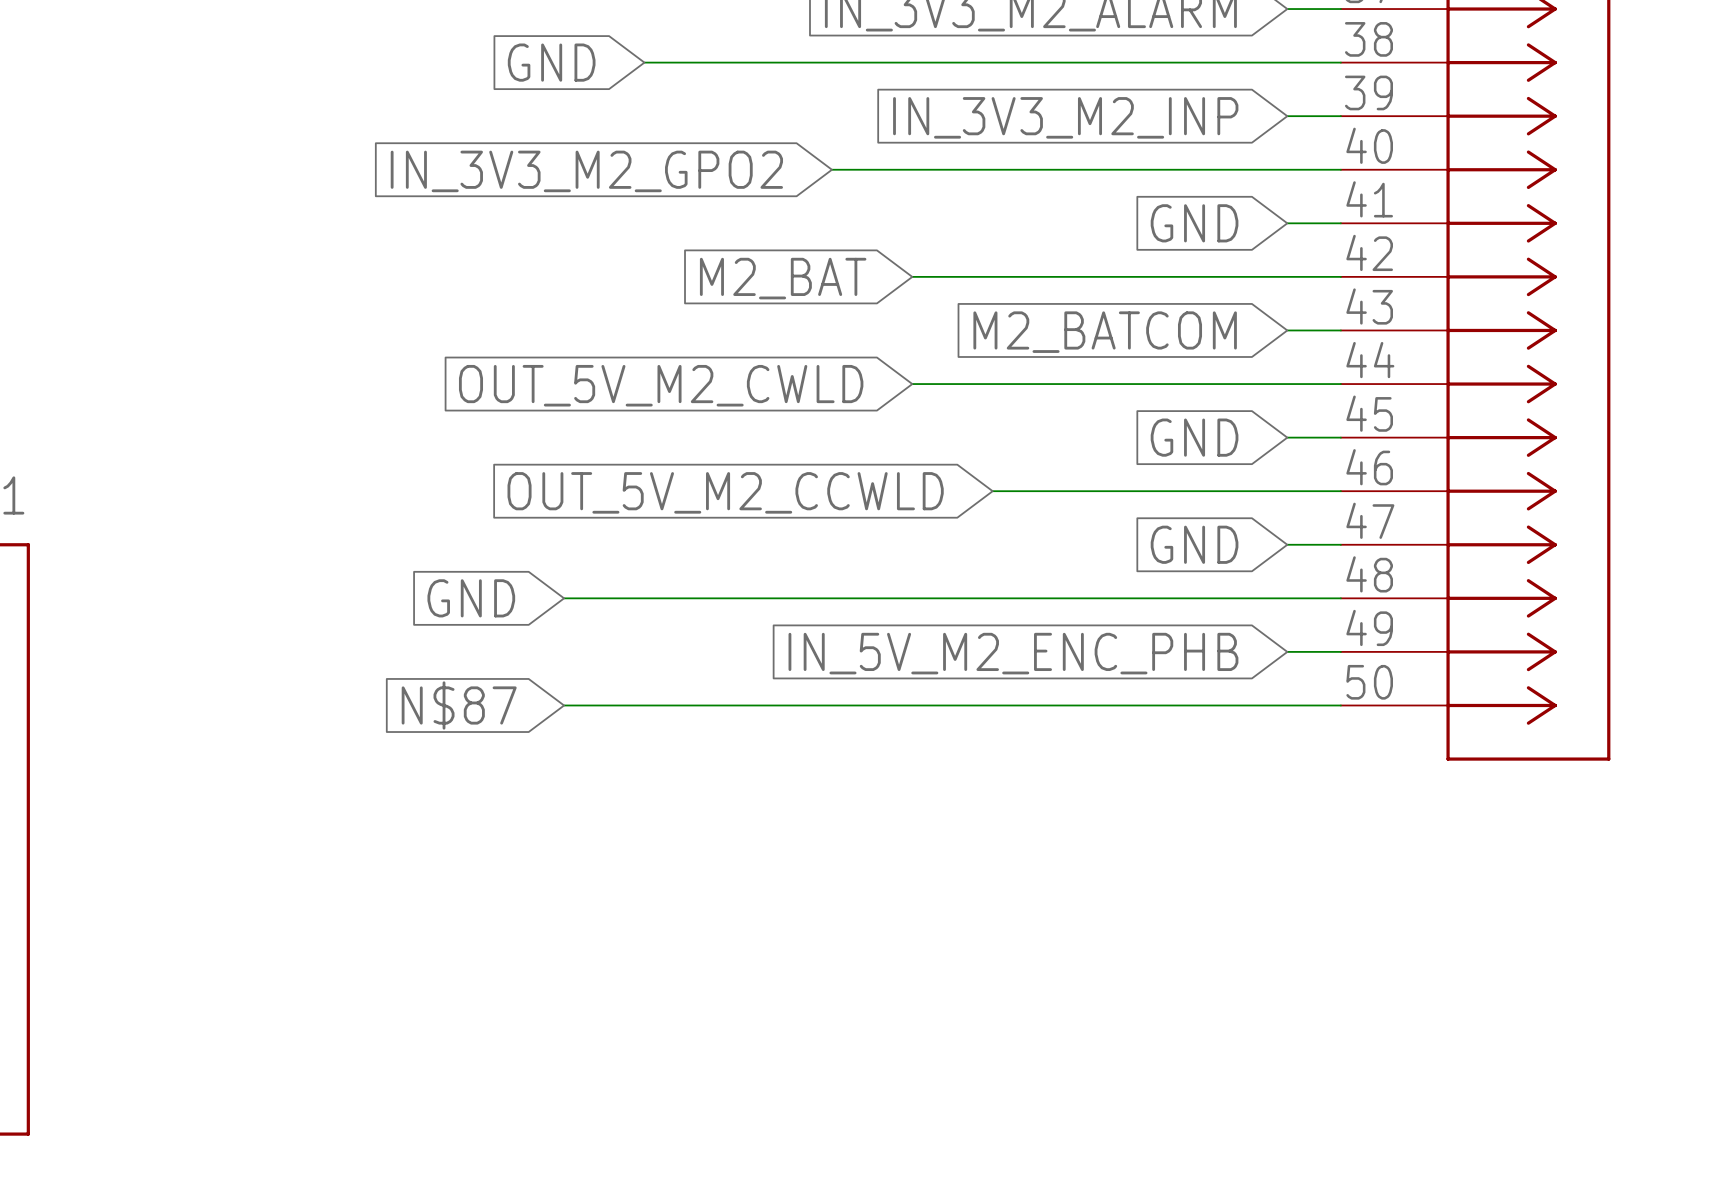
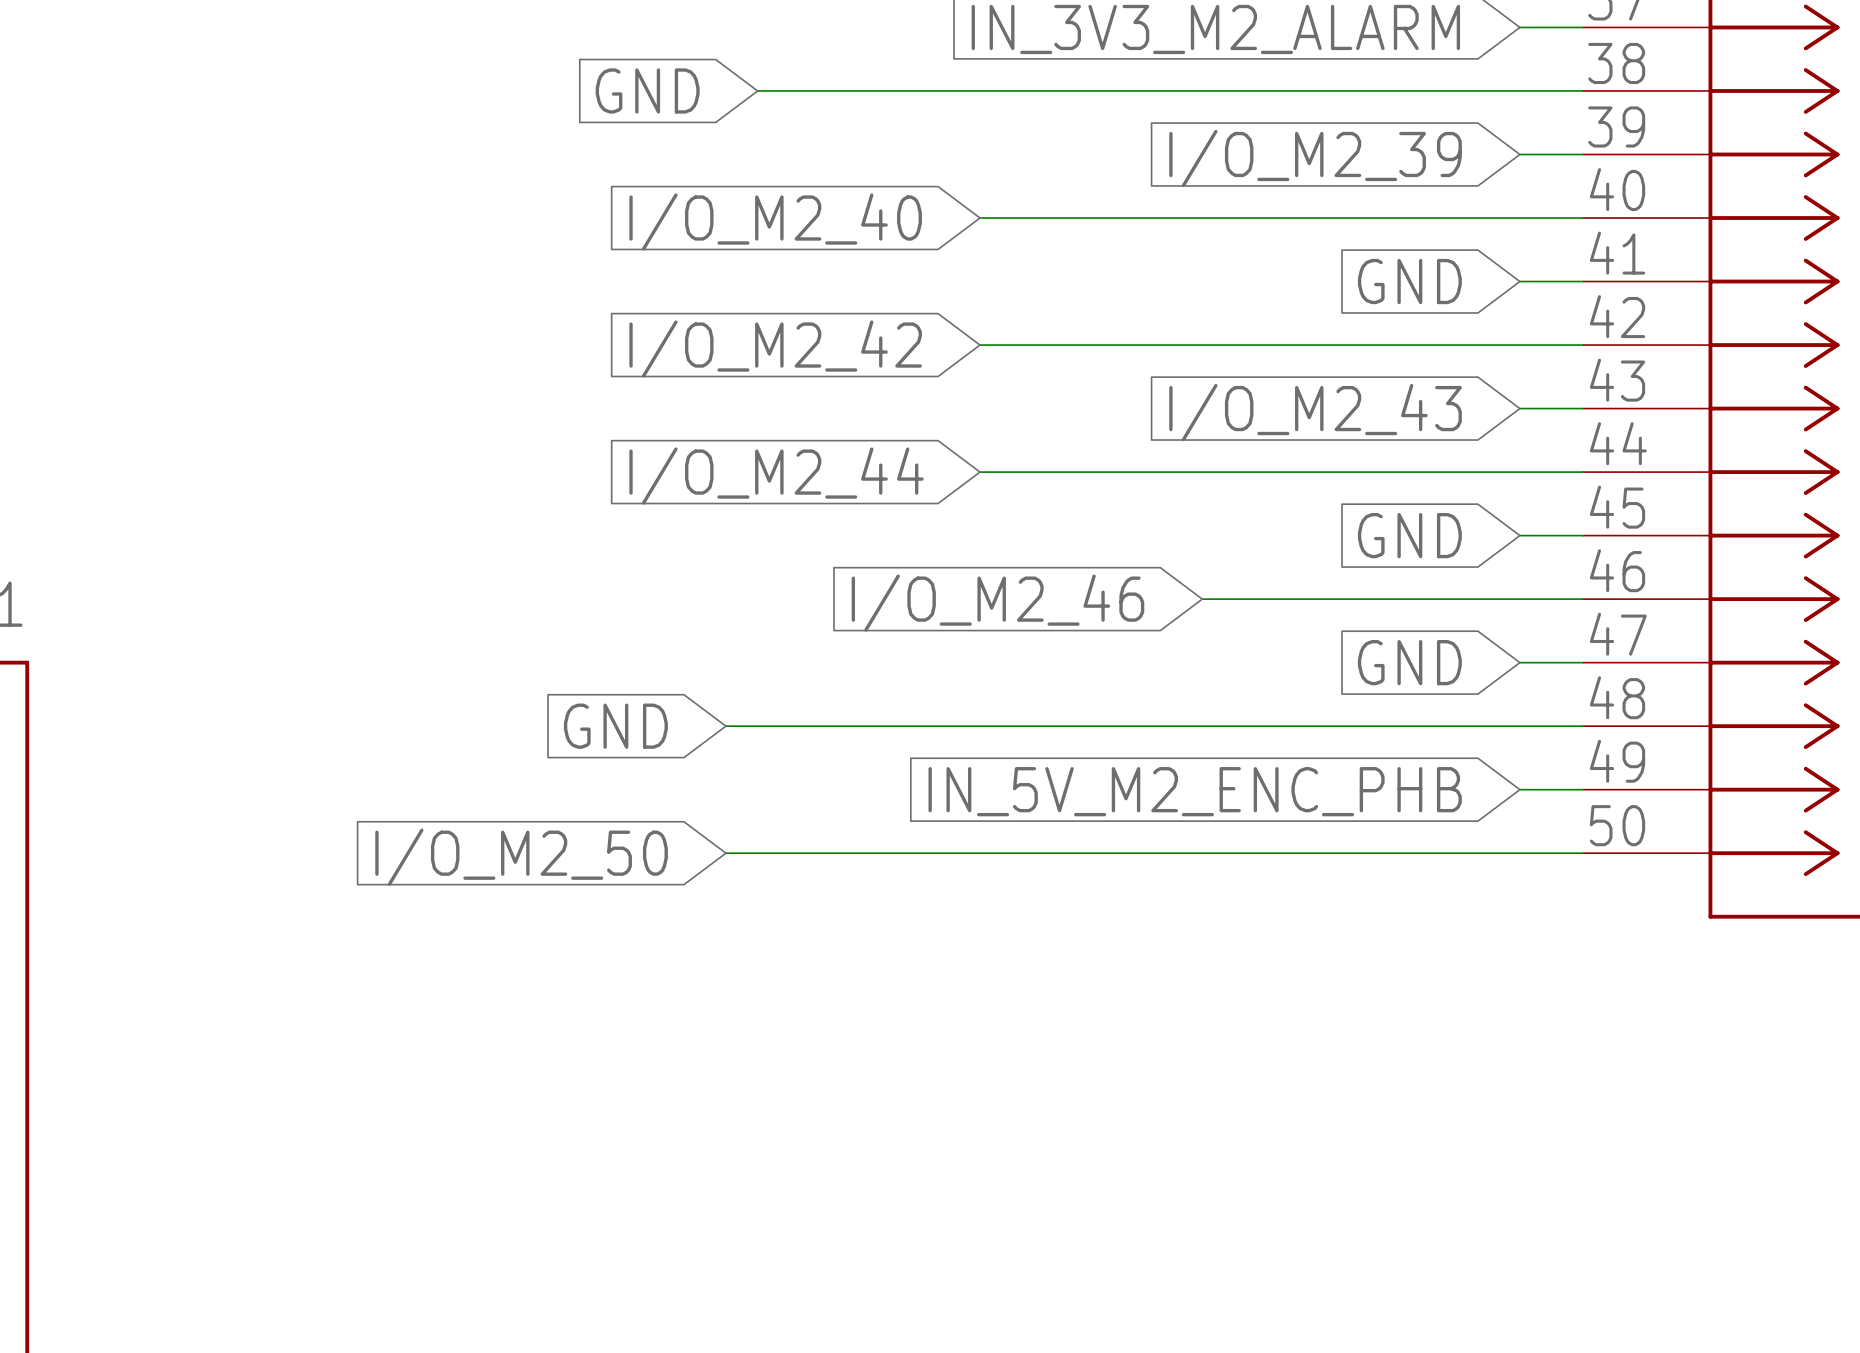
global label: IN_3V3_M2_INP (1065, 117) -> I/O_M2_39 (1315, 158)
global label: IN_3V3_M2_GPO2 (586, 171) -> I/O_M2_40 (775, 222)
wire: none -> (979, 345) (1075, 345)
global label: M2_BAT (783, 278) -> none
global label: none -> I/O_M2_42 (775, 349)
global label: M2_BATCOM (1105, 332) -> I/O_M2_43 (1315, 412)
wire: none -> (979, 472) (1075, 472)
global label: OUT_5V_M2_CWLD (661, 385) -> none
global label: none -> I/O_M2_44 (776, 476)
wire: (992, 491) (1019, 491) -> none
global label: OUT_5V_M2_CCWLD (725, 492) -> none
global label: none -> I/O_M2_46 (997, 603)
global label position: GND (471, 598) -> GND (615, 726)
wire: (564, 598) (617, 598) -> none
global label: N$87 (459, 705) -> none
wire: (564, 705) (617, 705) -> none
global label: none -> I/O_M2_50 (521, 857)

